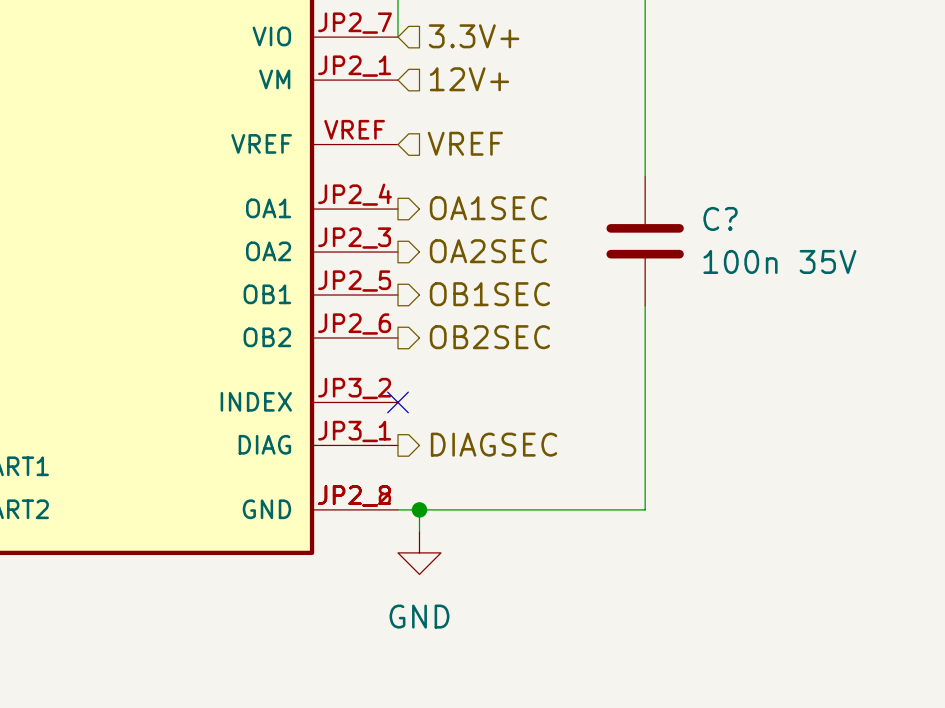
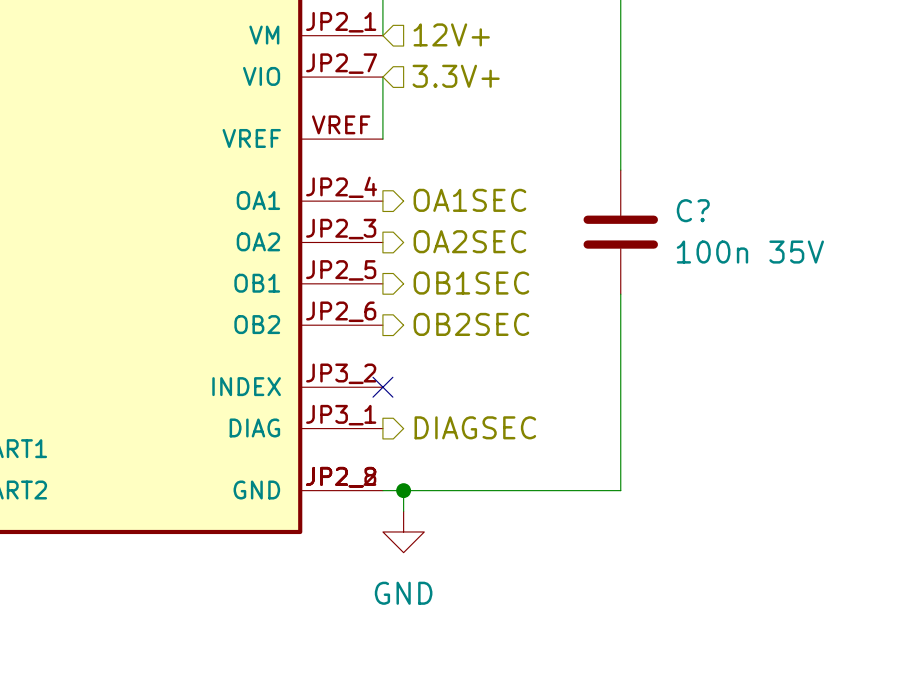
part pin number: JP2_7 (355, 23) -> JP2_1 (341, 22)
part pin name: VIO (271, 36) -> VM (264, 35)
hierarchical label: 3.3V+ (474, 36) -> 12V+ (451, 34)
part pin number: JP2_1 (354, 66) -> JP2_7 (341, 63)
part pin name: VM (274, 79) -> VIO (261, 76)
hierarchical label: 12V+ (469, 79) -> 3.3V+ (456, 76)
wire: none -> (382, 77) (382, 139)
hierarchical label: VREF (465, 143) -> none

